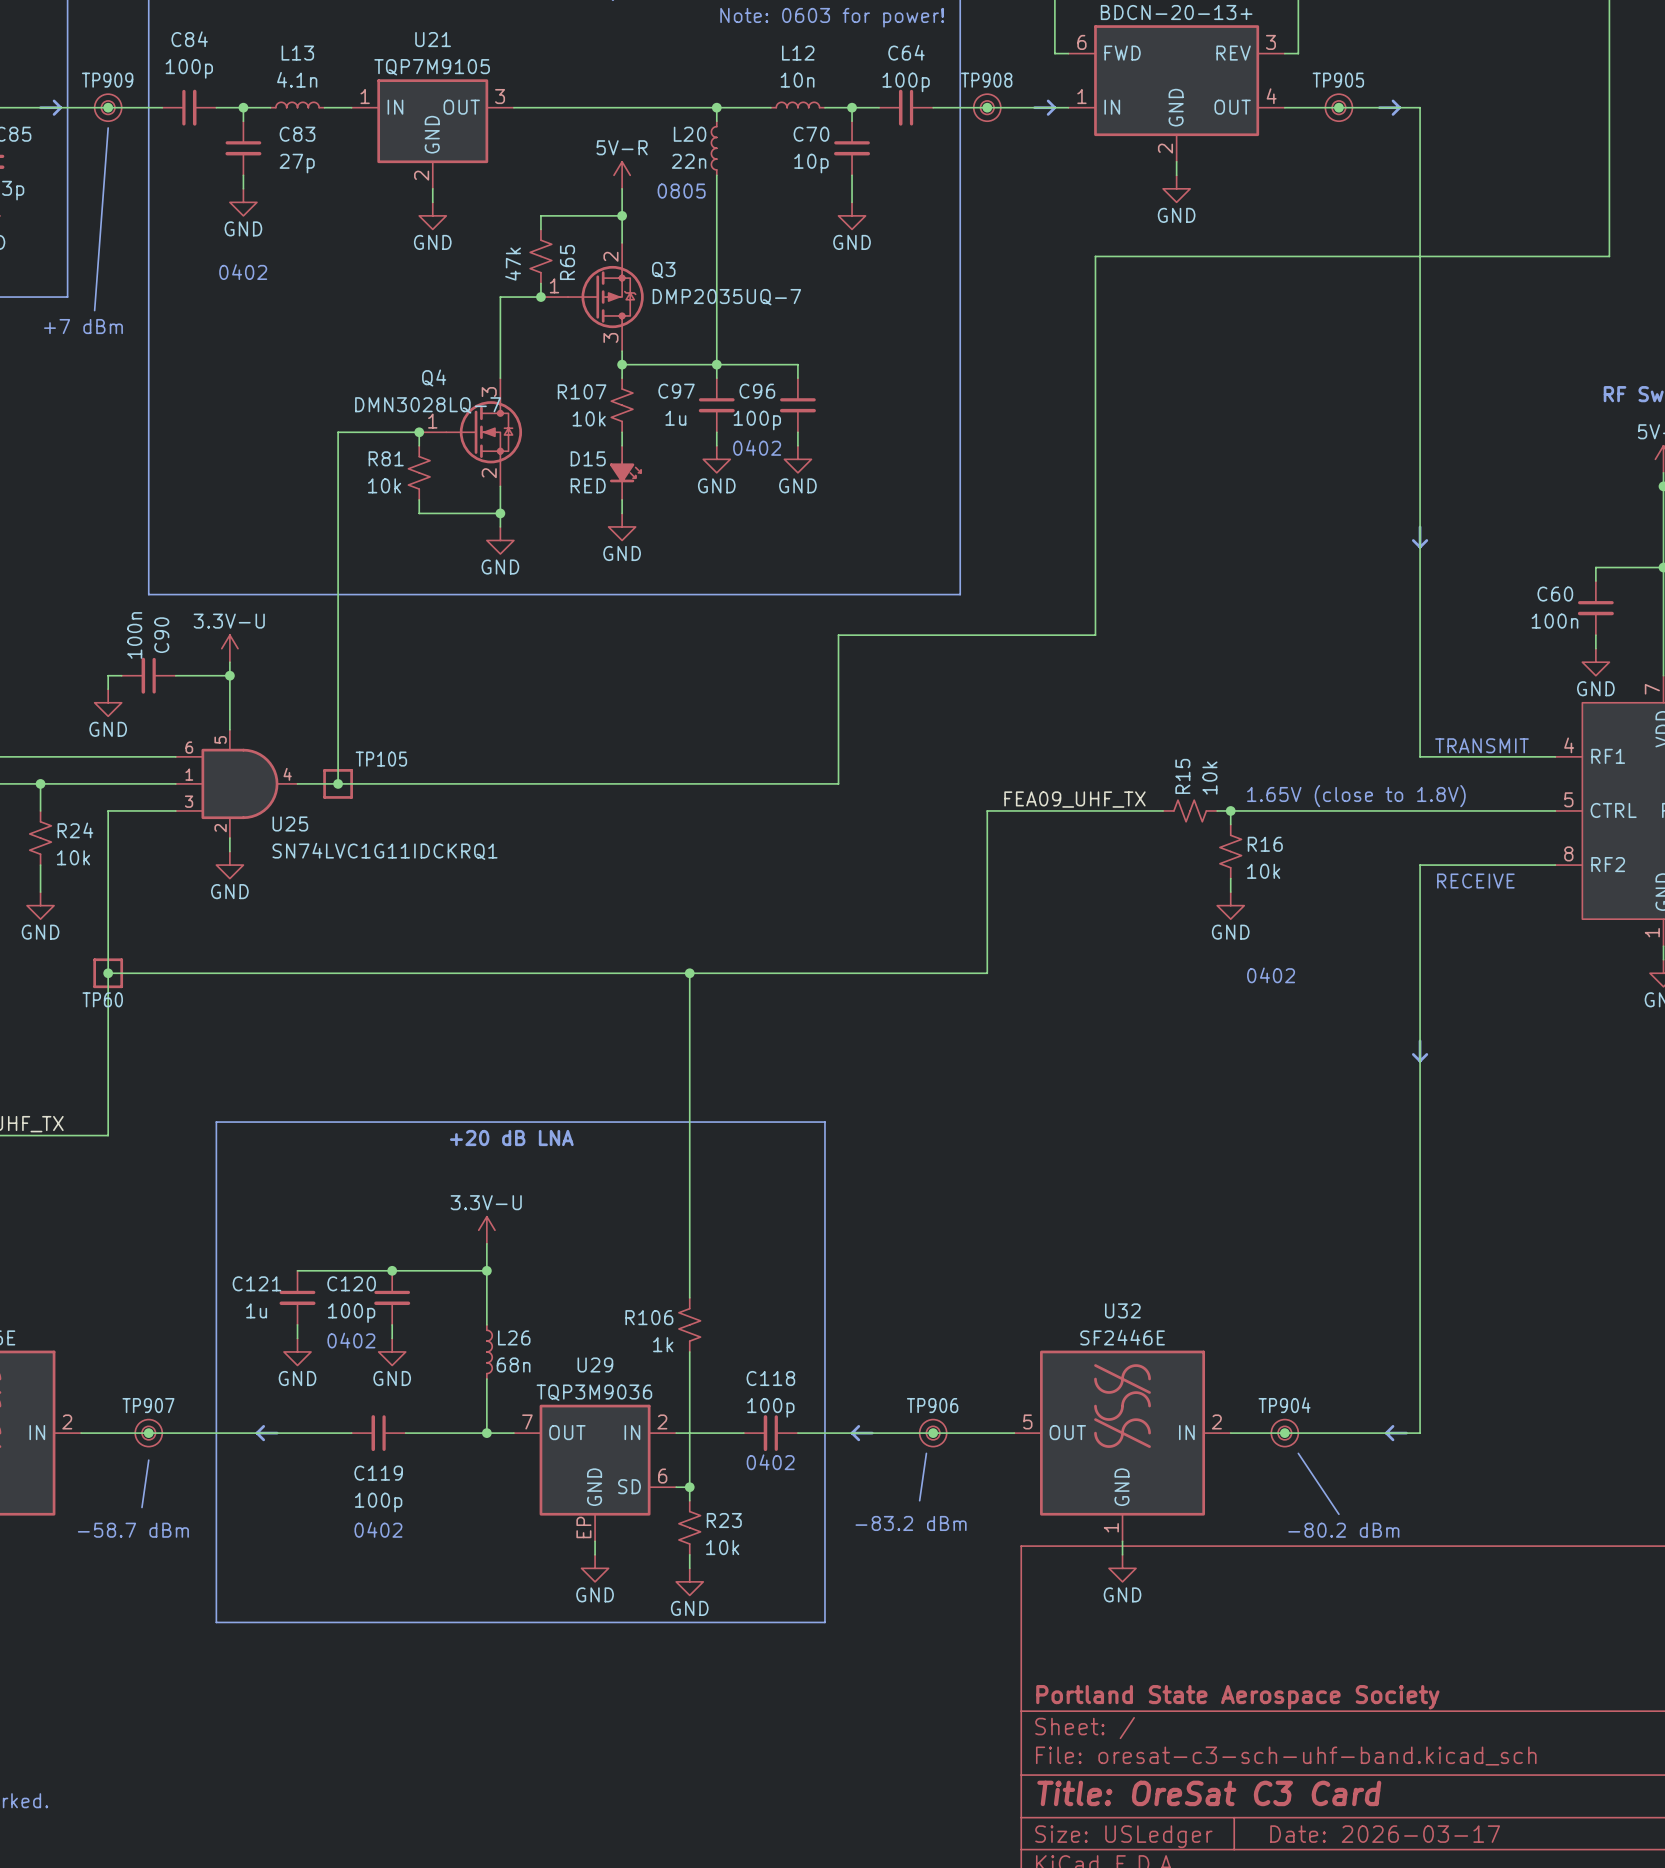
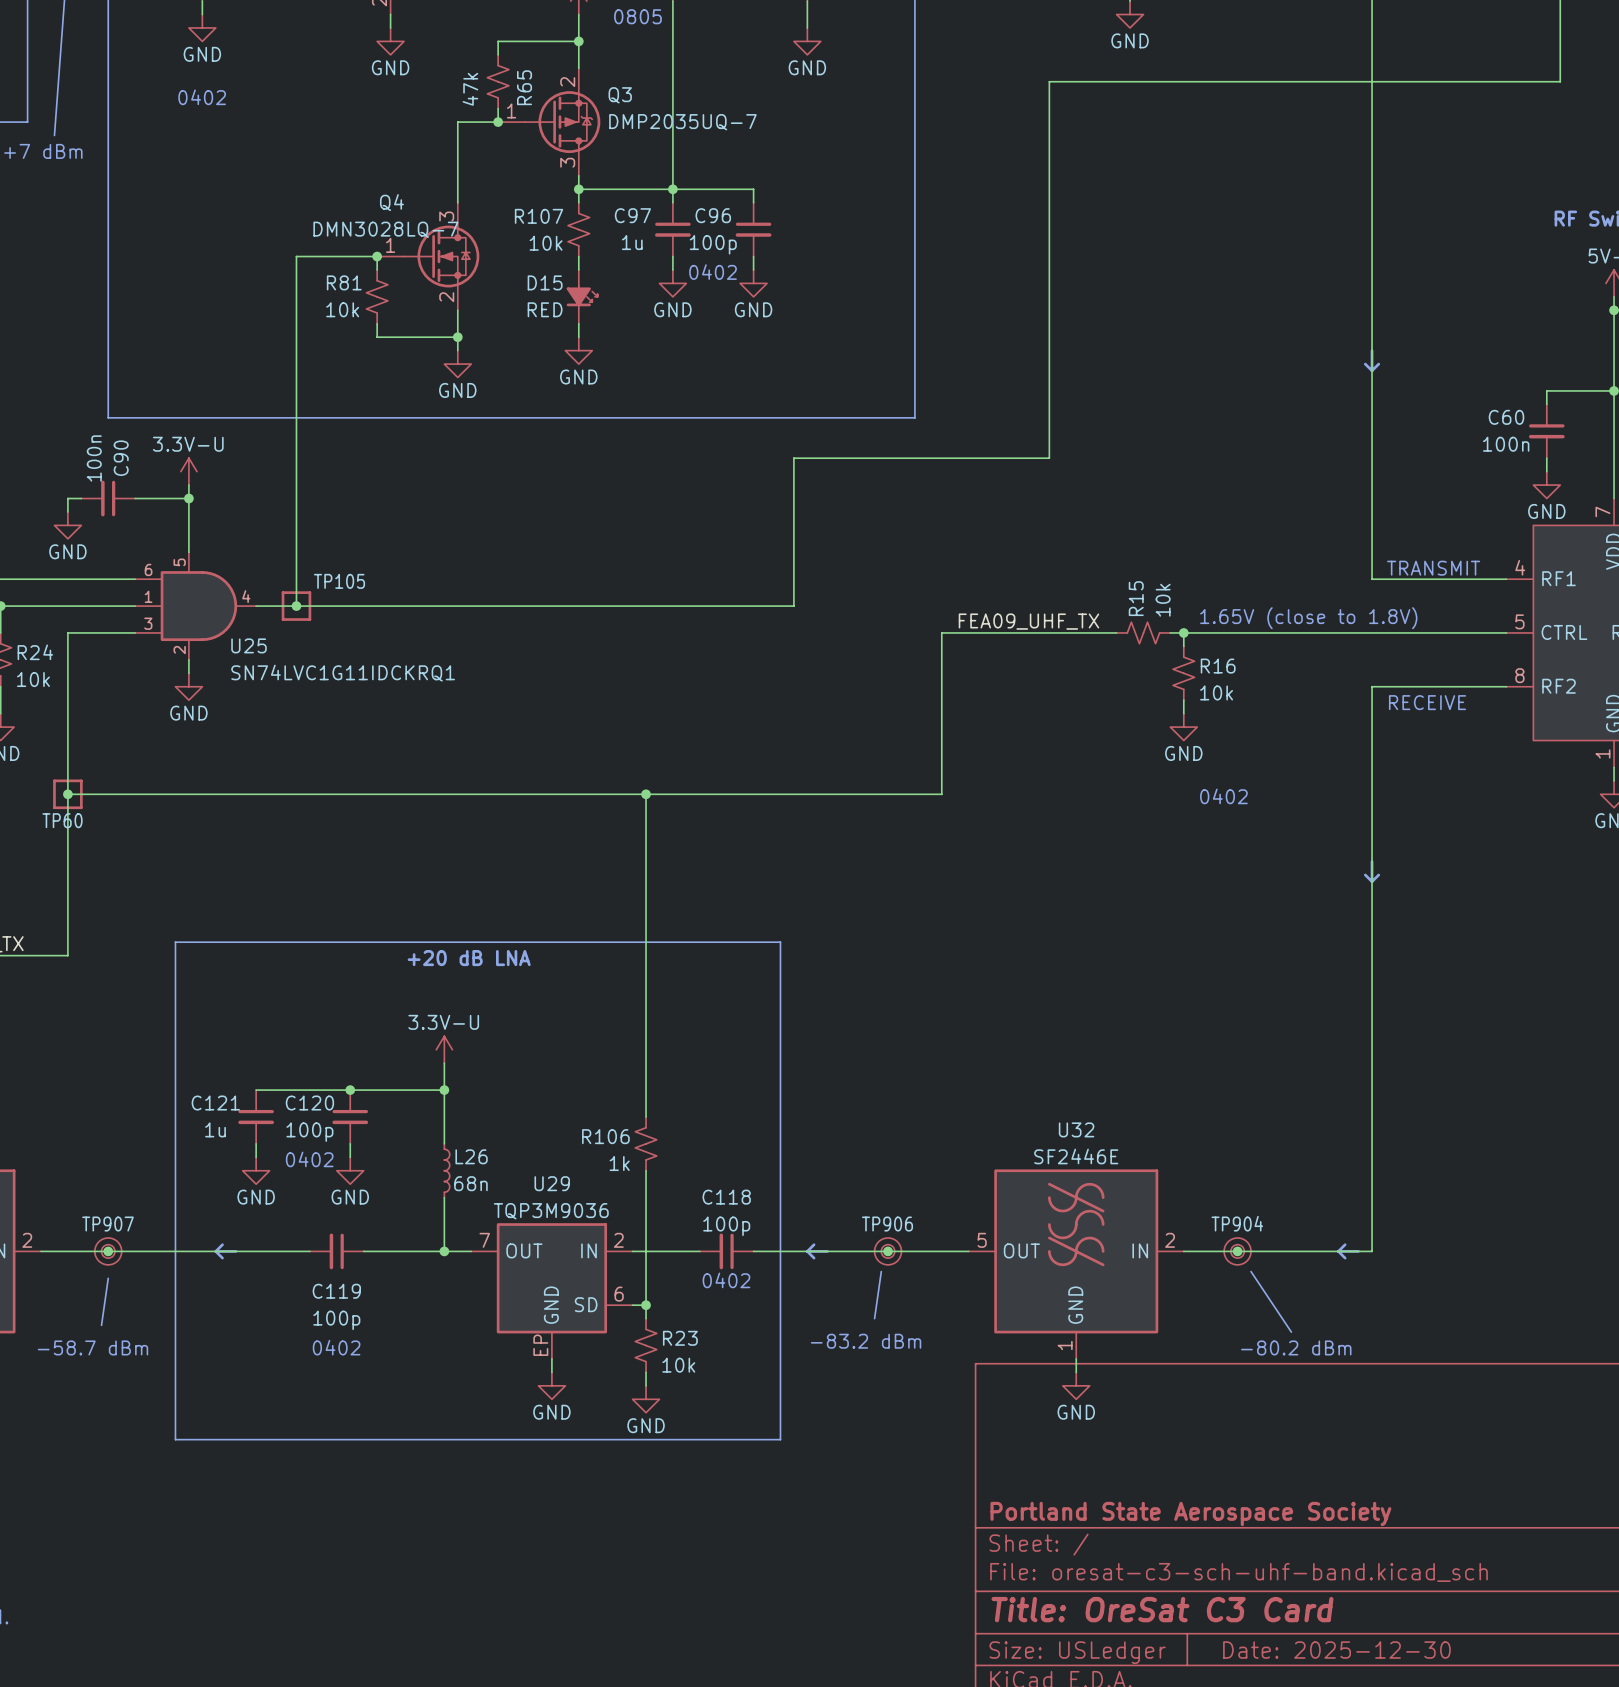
title block: Date: 2026-03-17 (1385, 1834) -> Date: 2025-12-30 (1336, 1650)

